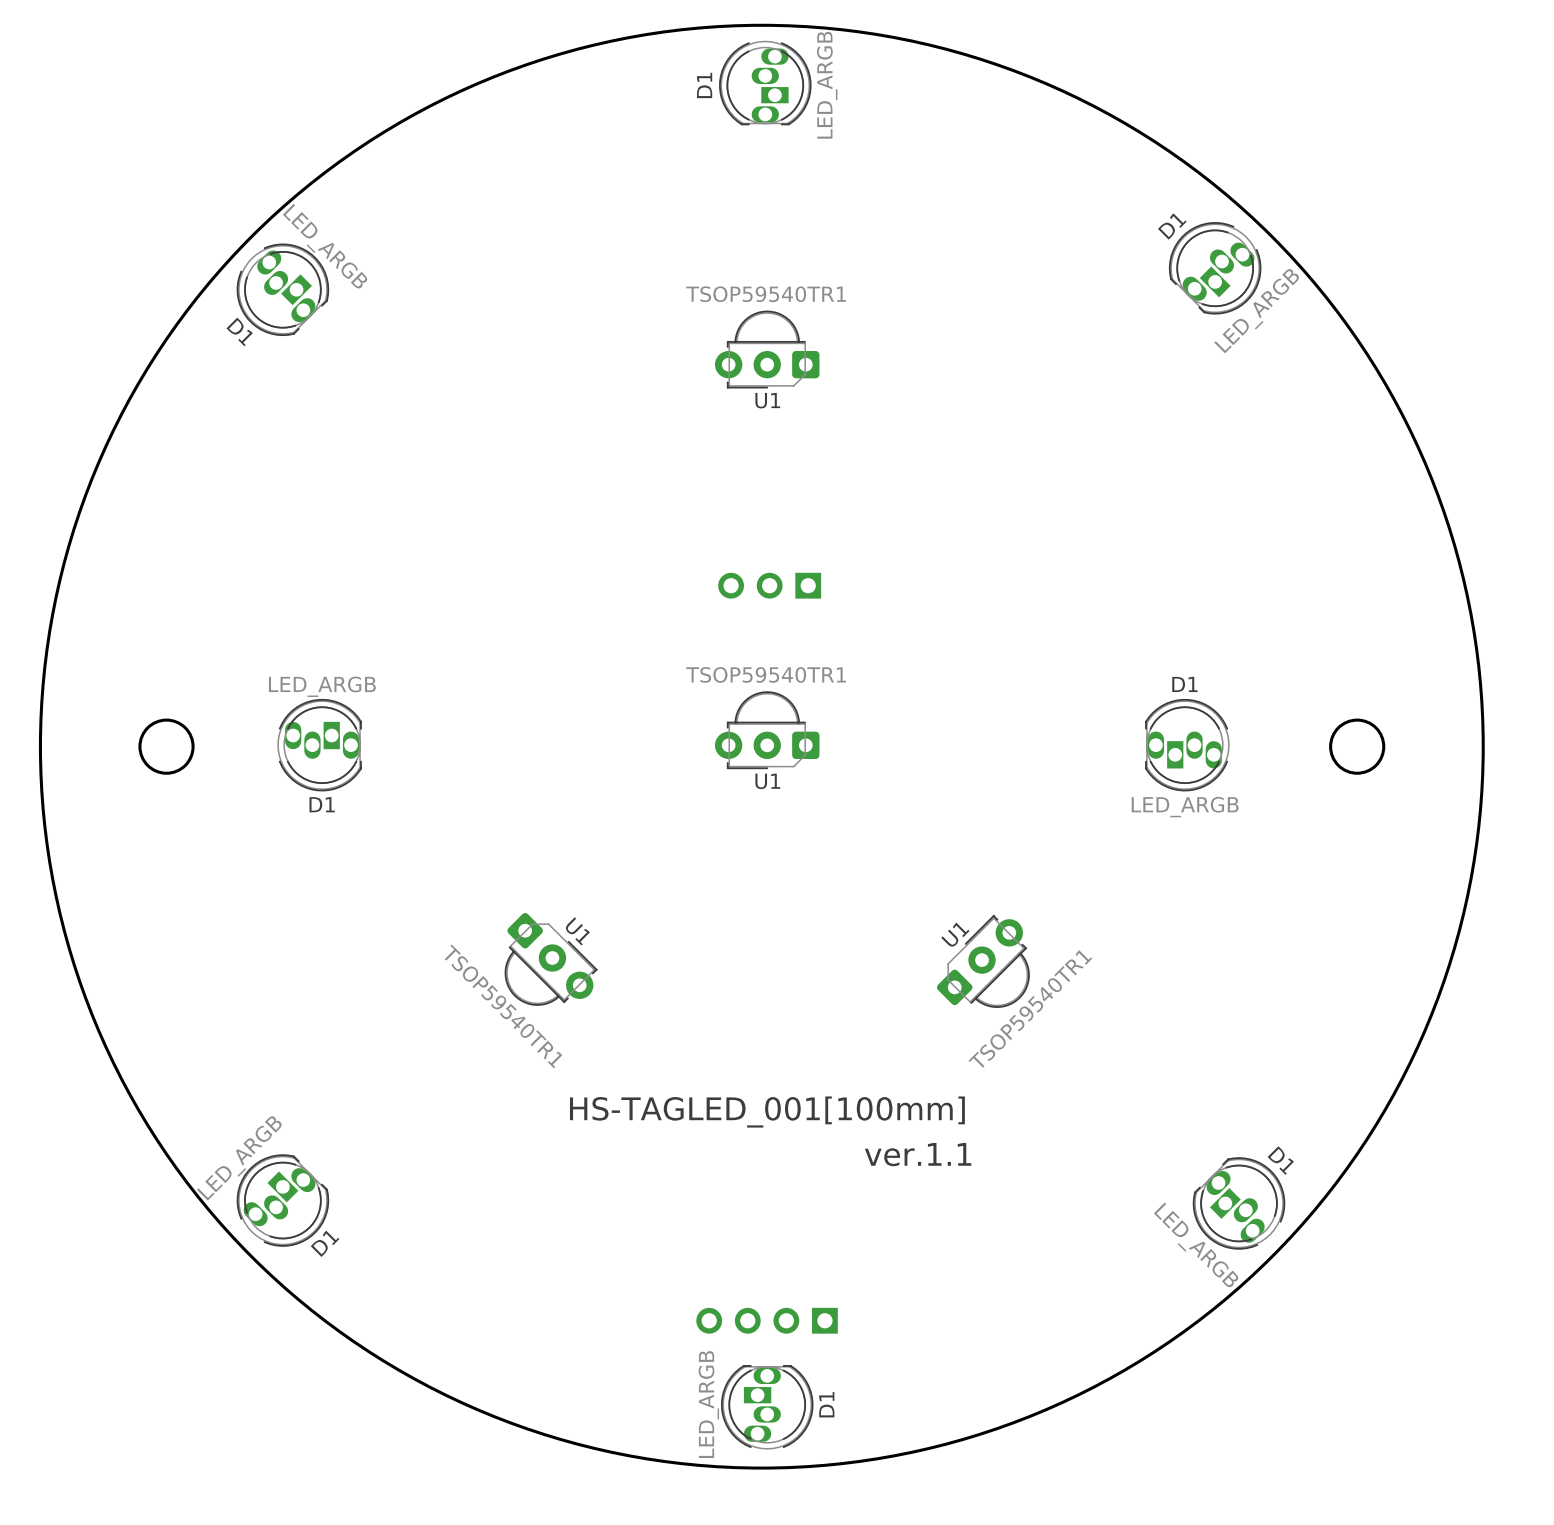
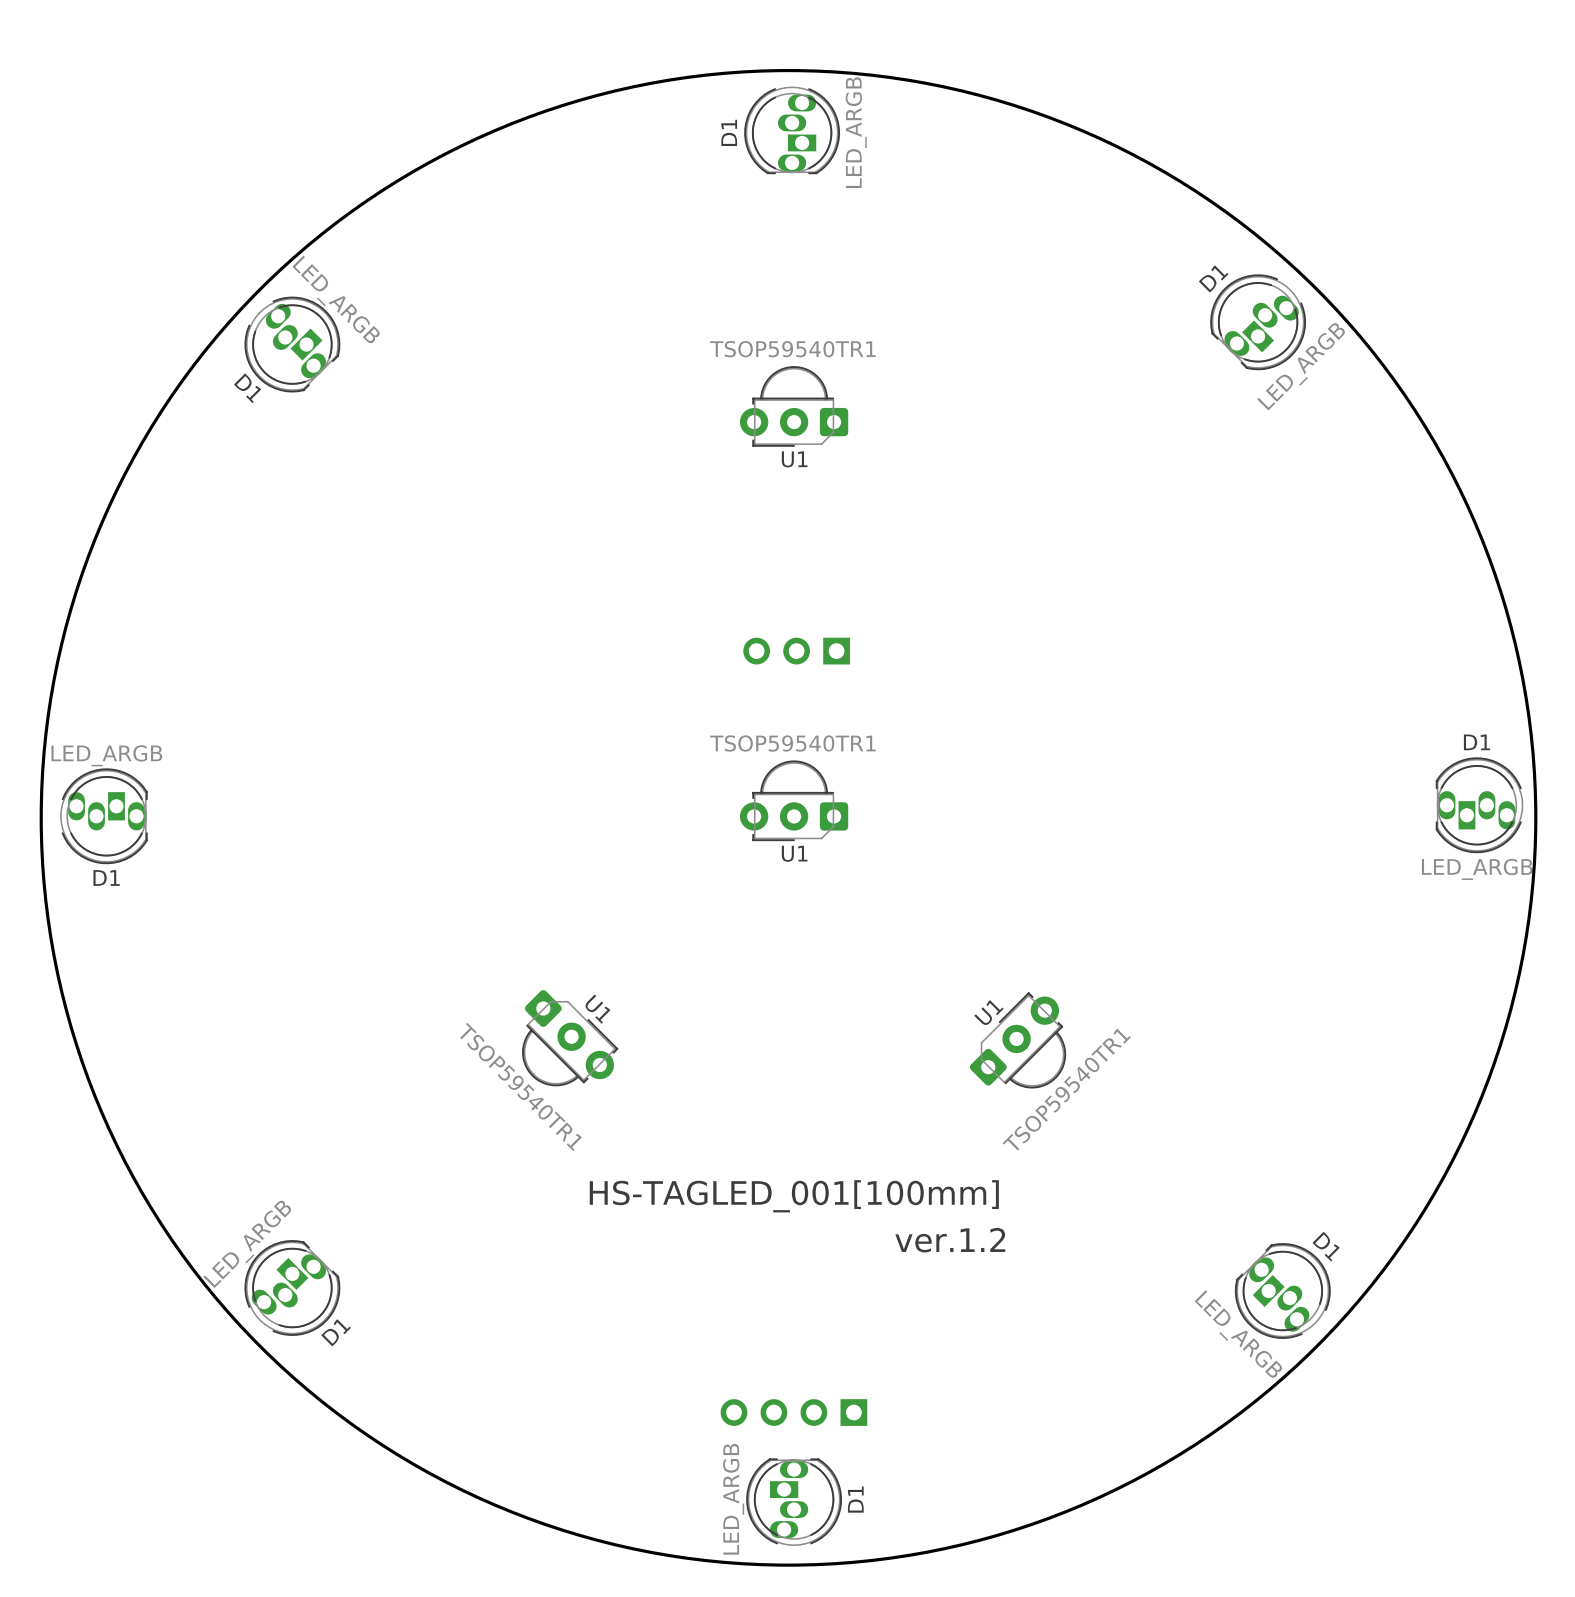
round board edge: [138, 718, 195, 775] -> none
round board edge: [1329, 718, 1386, 775] -> none
D1 position: (319, 745) -> (103, 816)
D1 position: (1187, 745) -> (1479, 805)
text: ver.1.1 (918, 1154) -> ver.1.2 (950, 1240)

